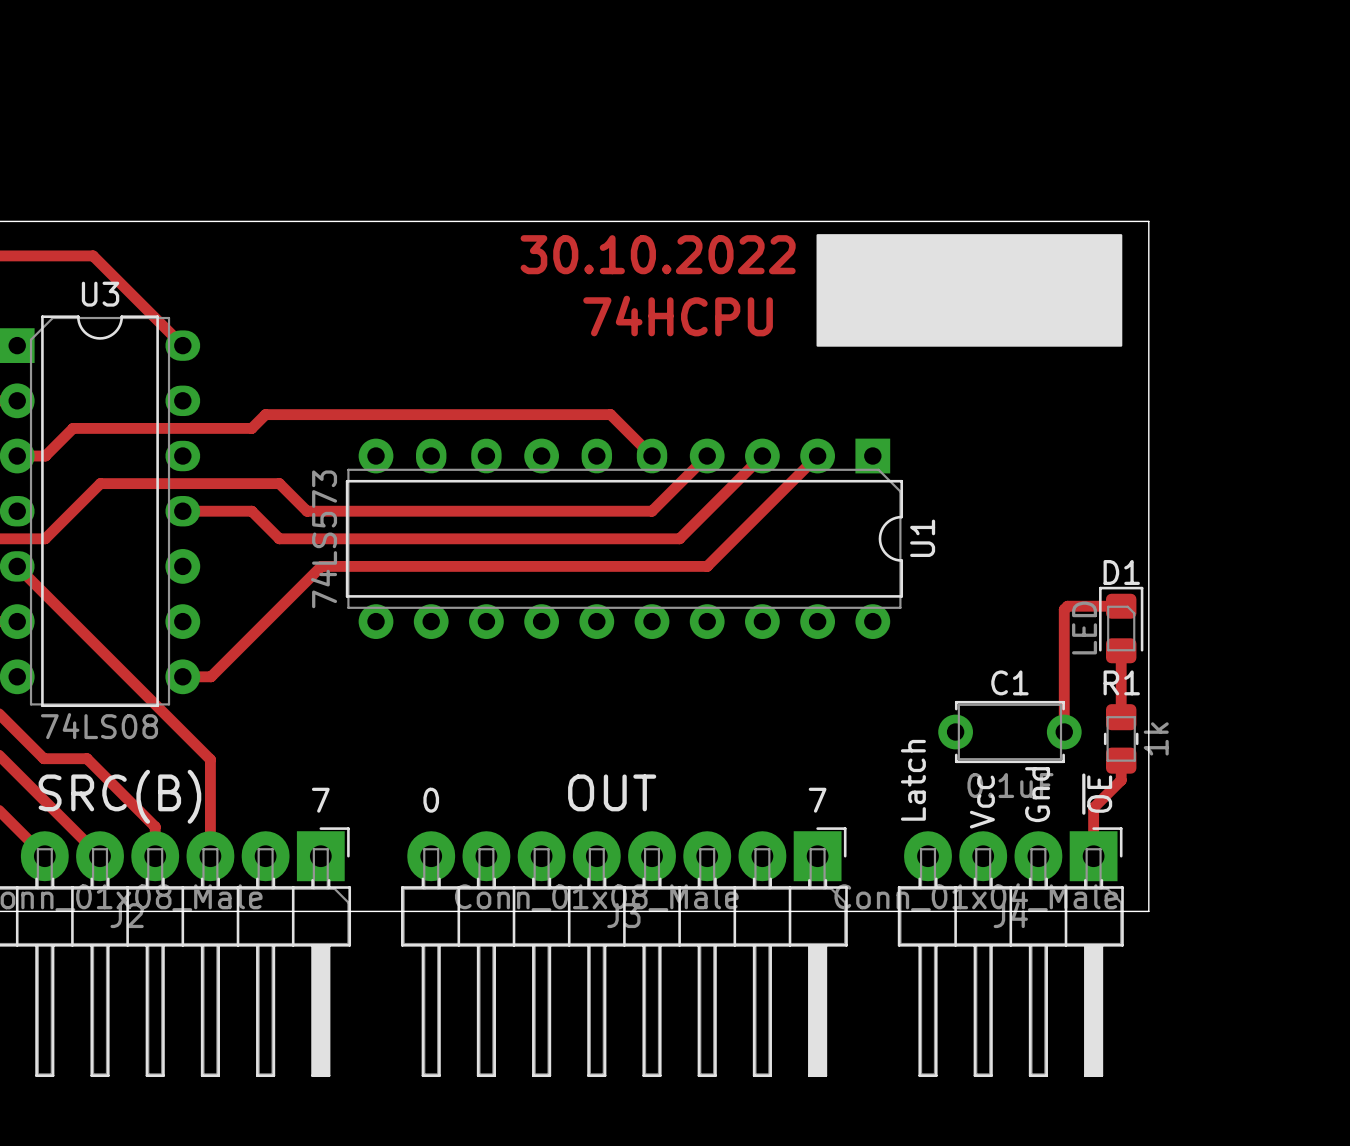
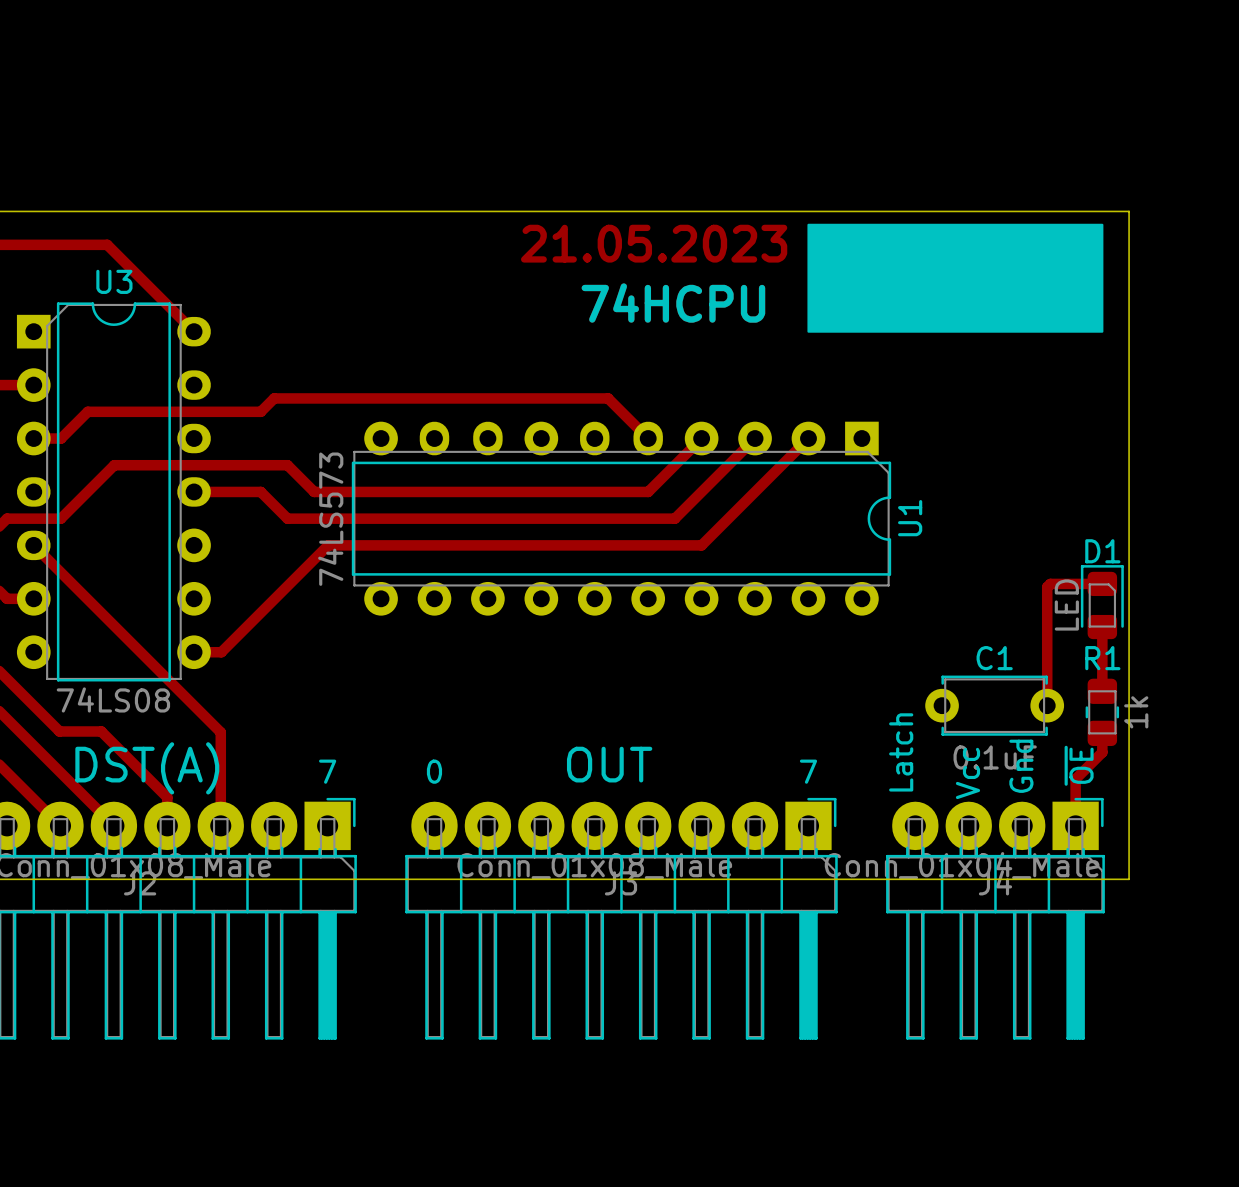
text: 30.10.2022 (658, 254) -> 21.05.2023 (654, 243)
text: none -> 74HCPU (673, 303)
text: SRC(B) (119, 796) -> DST(A) (147, 768)

